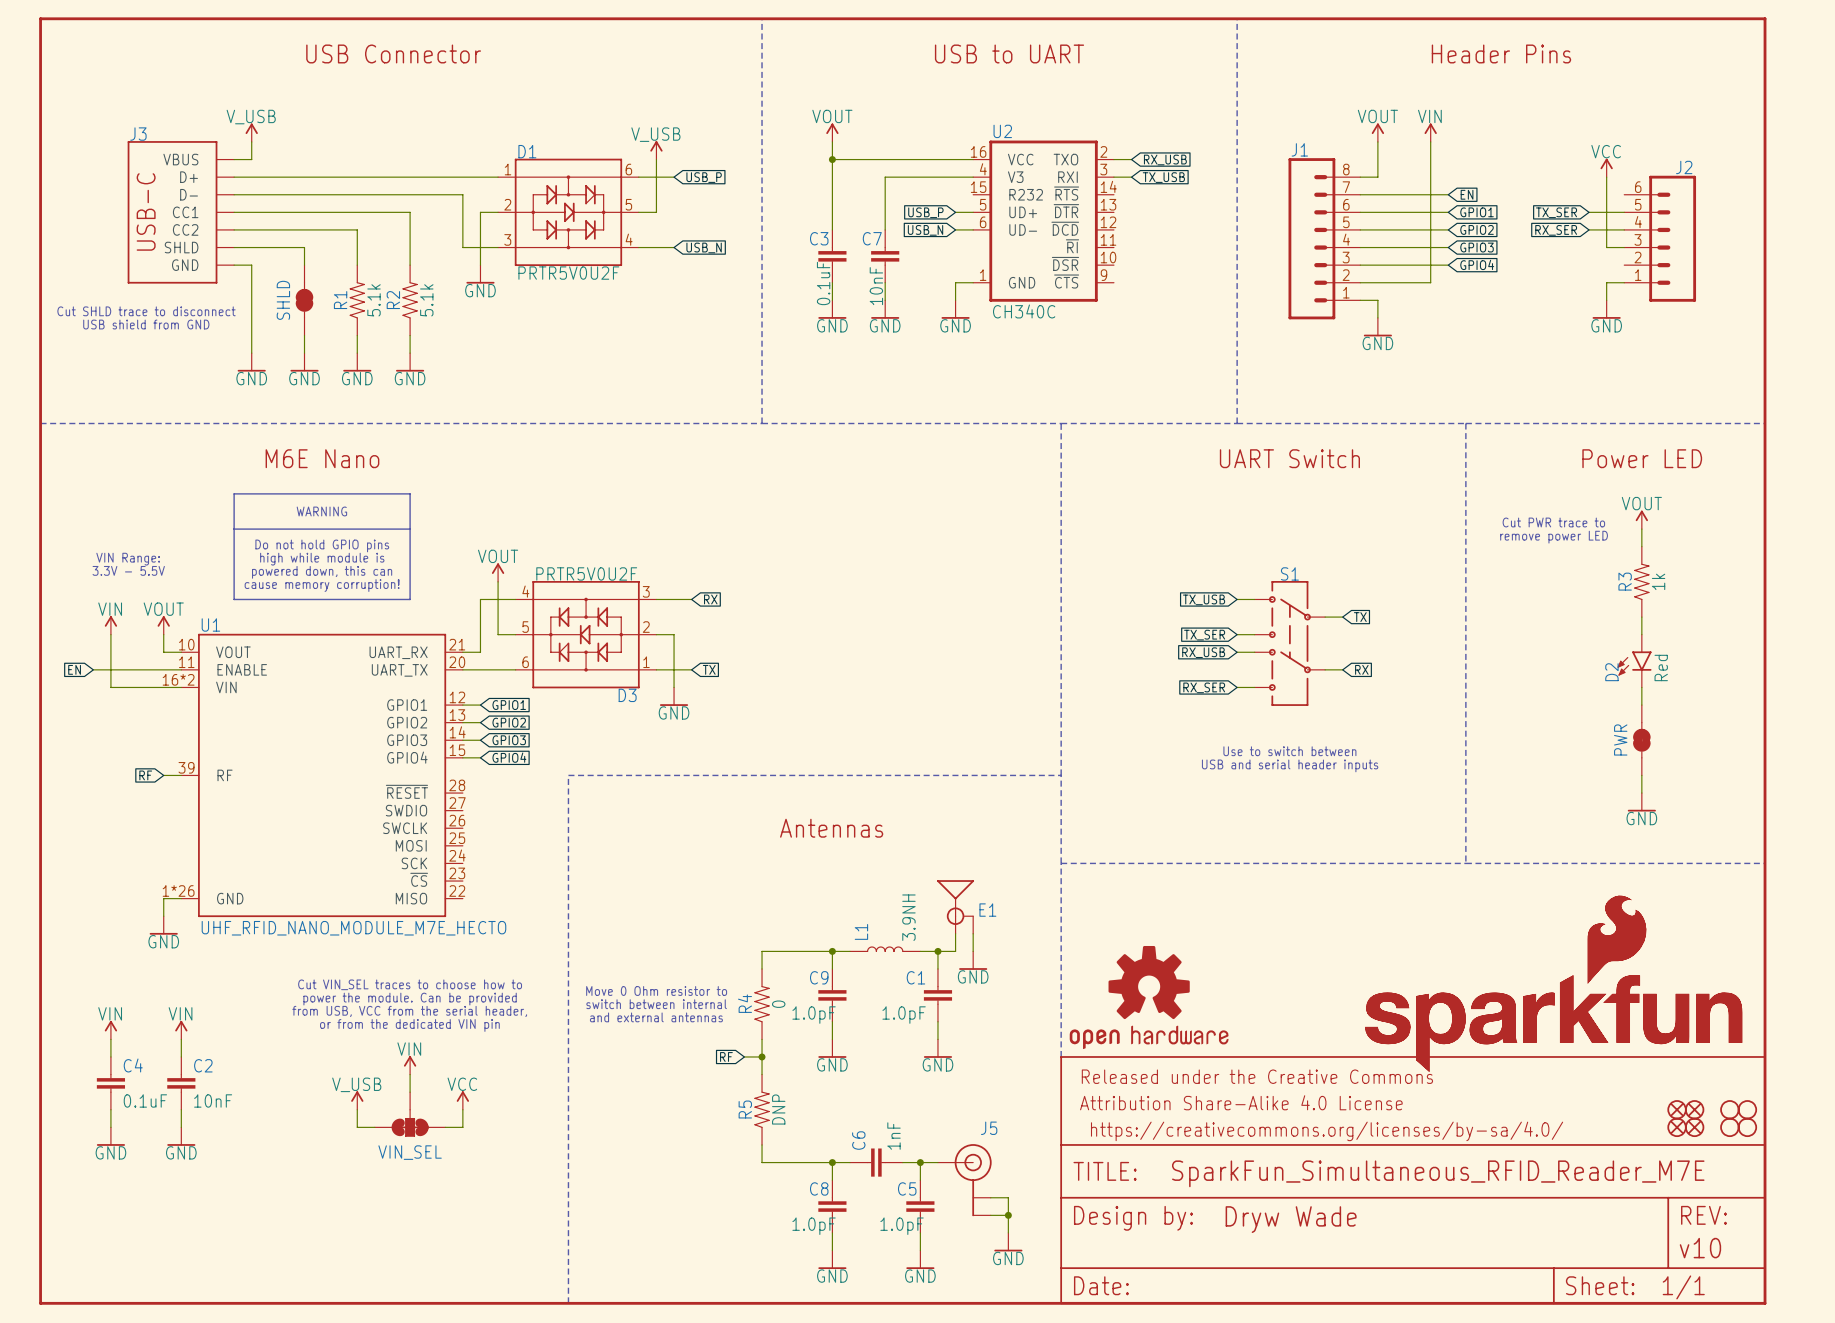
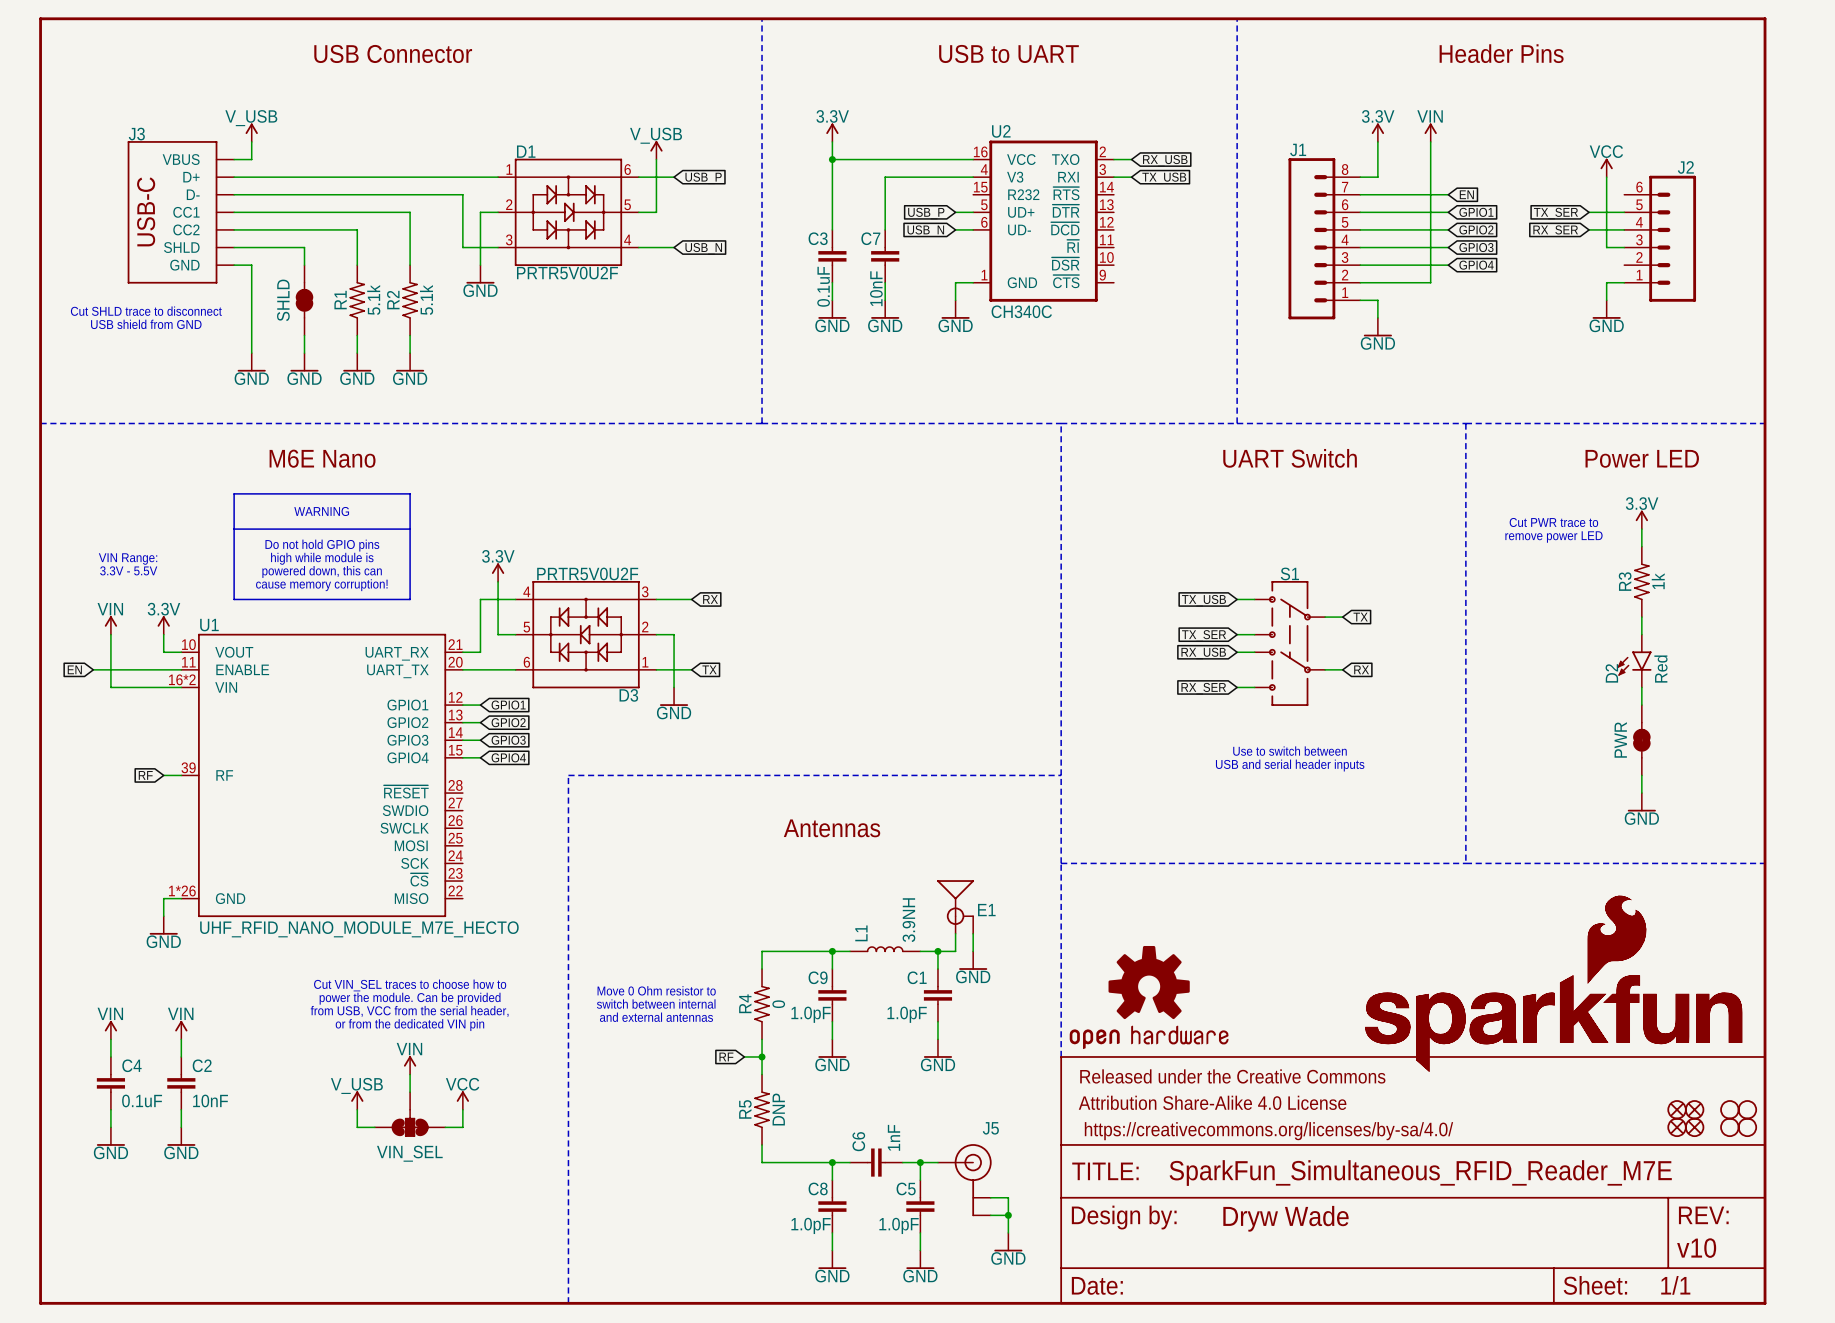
power symbol: VOUT (832, 132) -> 3.3V (832, 132)
power symbol: VOUT (1377, 132) -> 3.3V (1377, 132)
power symbol: VOUT (1641, 519) -> 3.3V (1641, 519)
power symbol: VOUT (498, 572) -> 3.3V (498, 572)
power symbol: VOUT (163, 625) -> 3.3V (163, 625)

